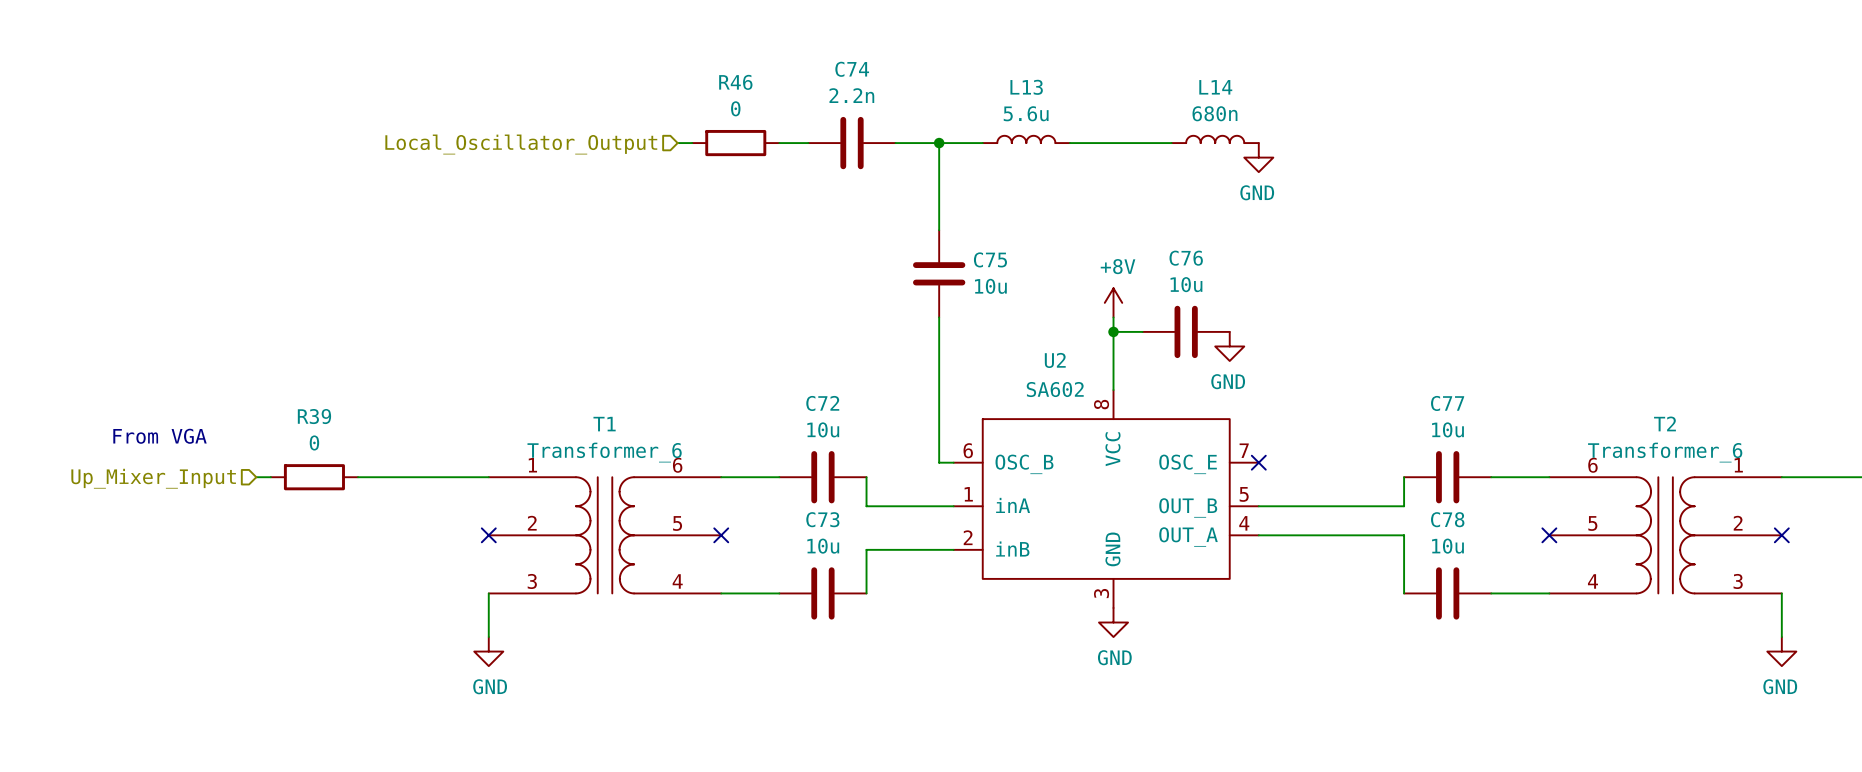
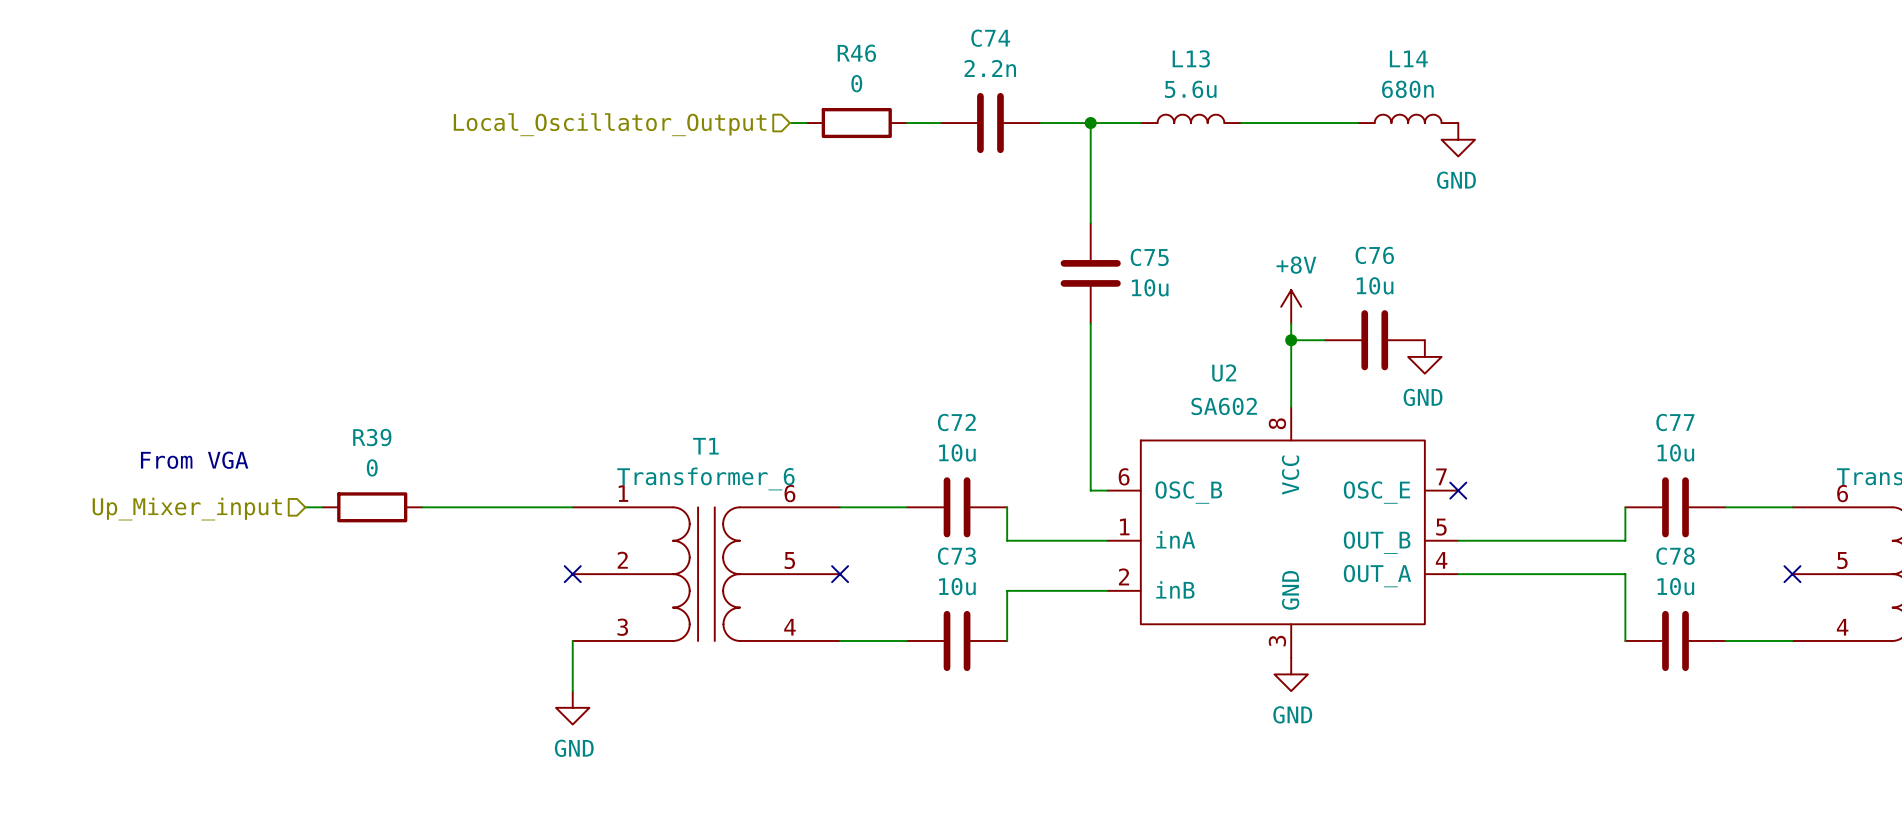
hierarchical label: Up_Mixer_Input (153, 478) -> Up_Mixer_input (187, 509)

